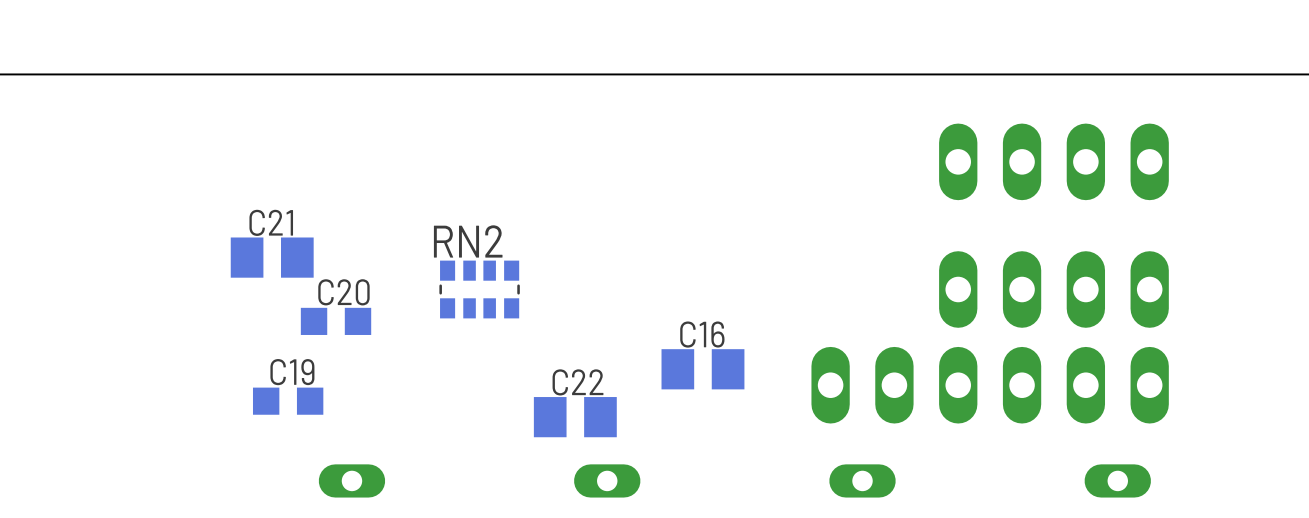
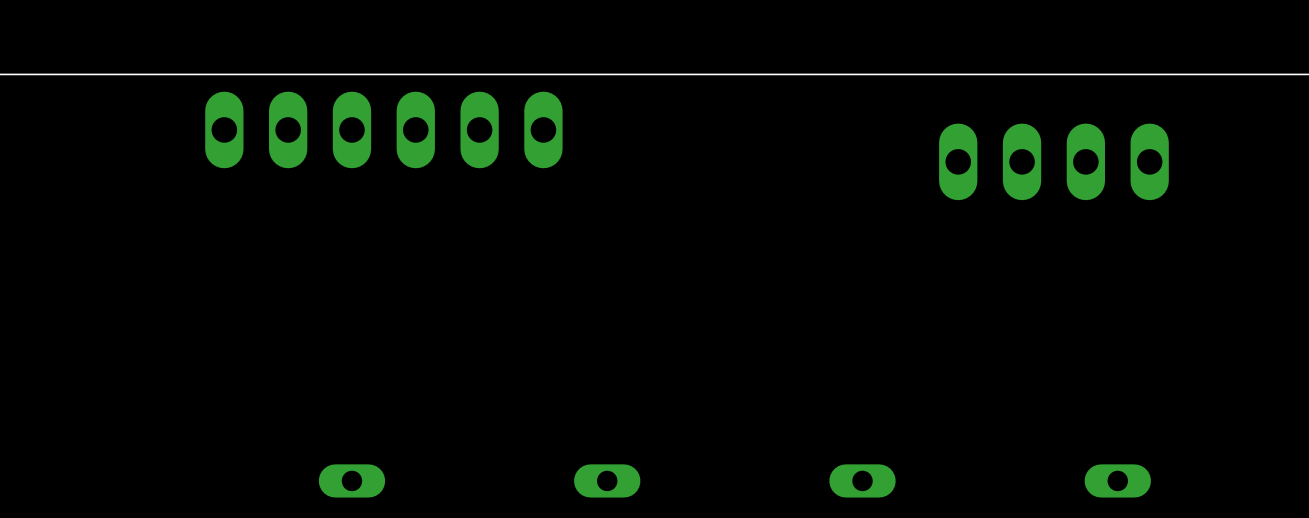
part: none -> (383, 129)
C21: (272, 257) -> none
RN2: (479, 289) -> none
part: (990, 289) -> none
part: (1117, 289) -> none
C20: (336, 321) -> none
C16: (702, 369) -> none
part: (990, 385) -> none
C19: (288, 401) -> none
C22: (575, 417) -> none

